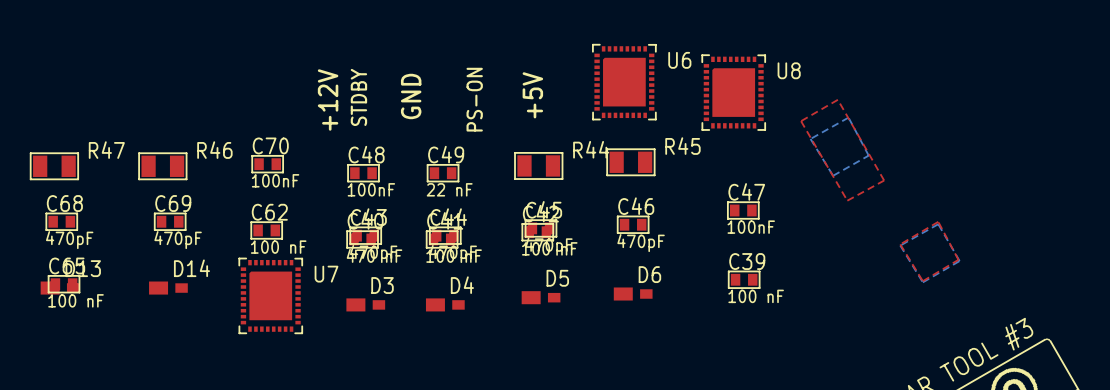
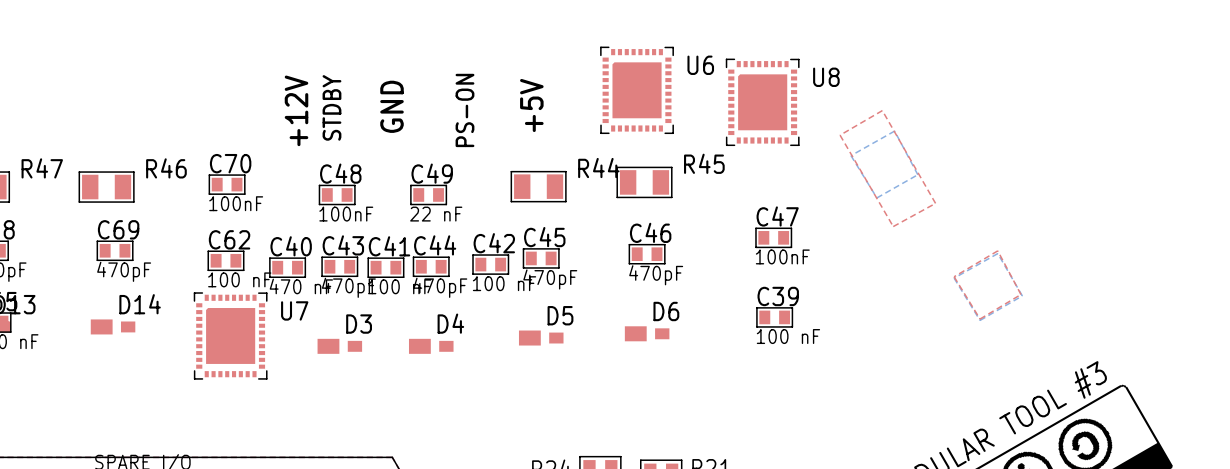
C42 position: (537, 232) -> (490, 264)
C40 position: (362, 239) -> (287, 267)
C41 position: (442, 239) -> (385, 267)

